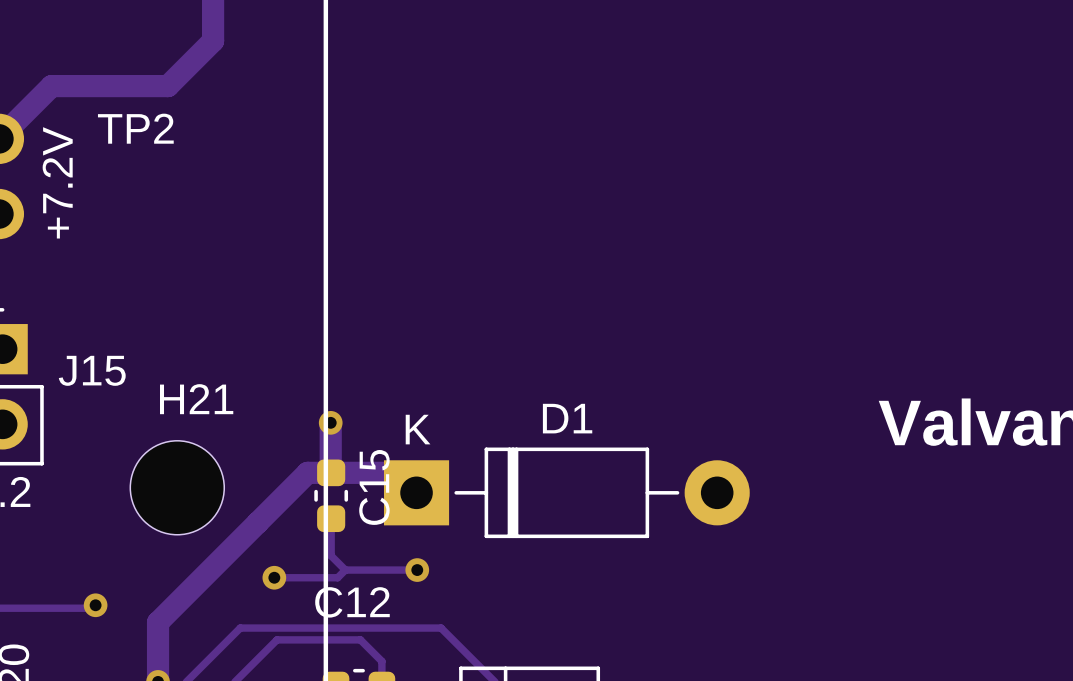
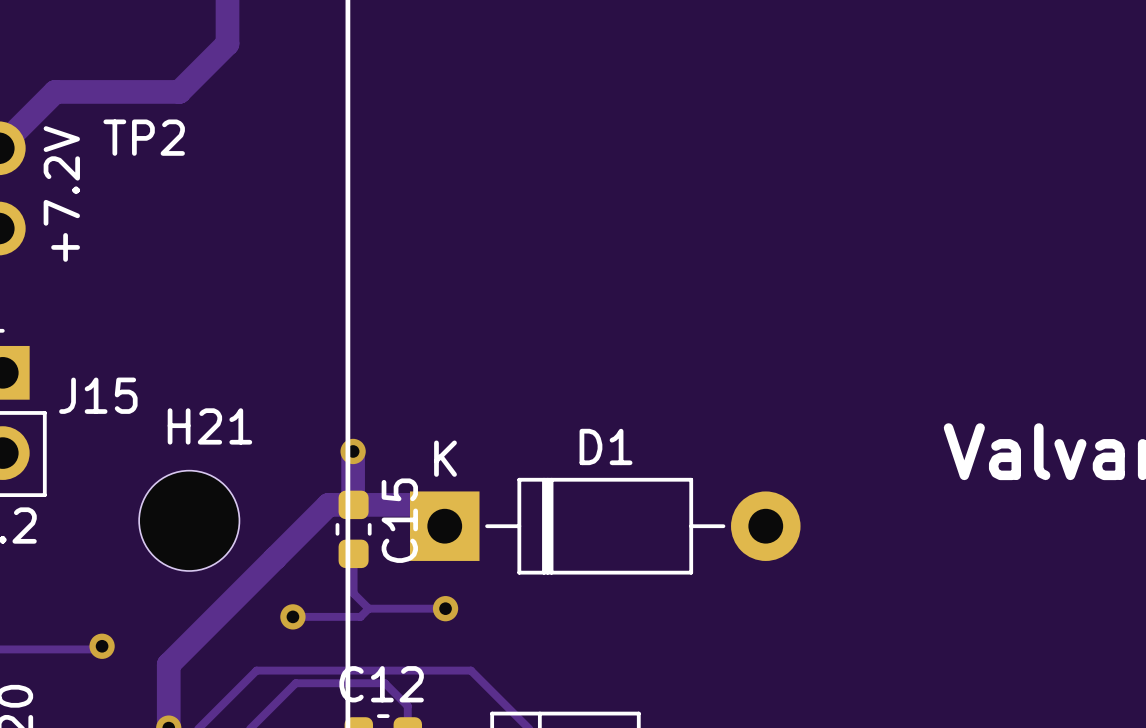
C12 name position: C12 (352, 602) -> C12 (381, 684)

